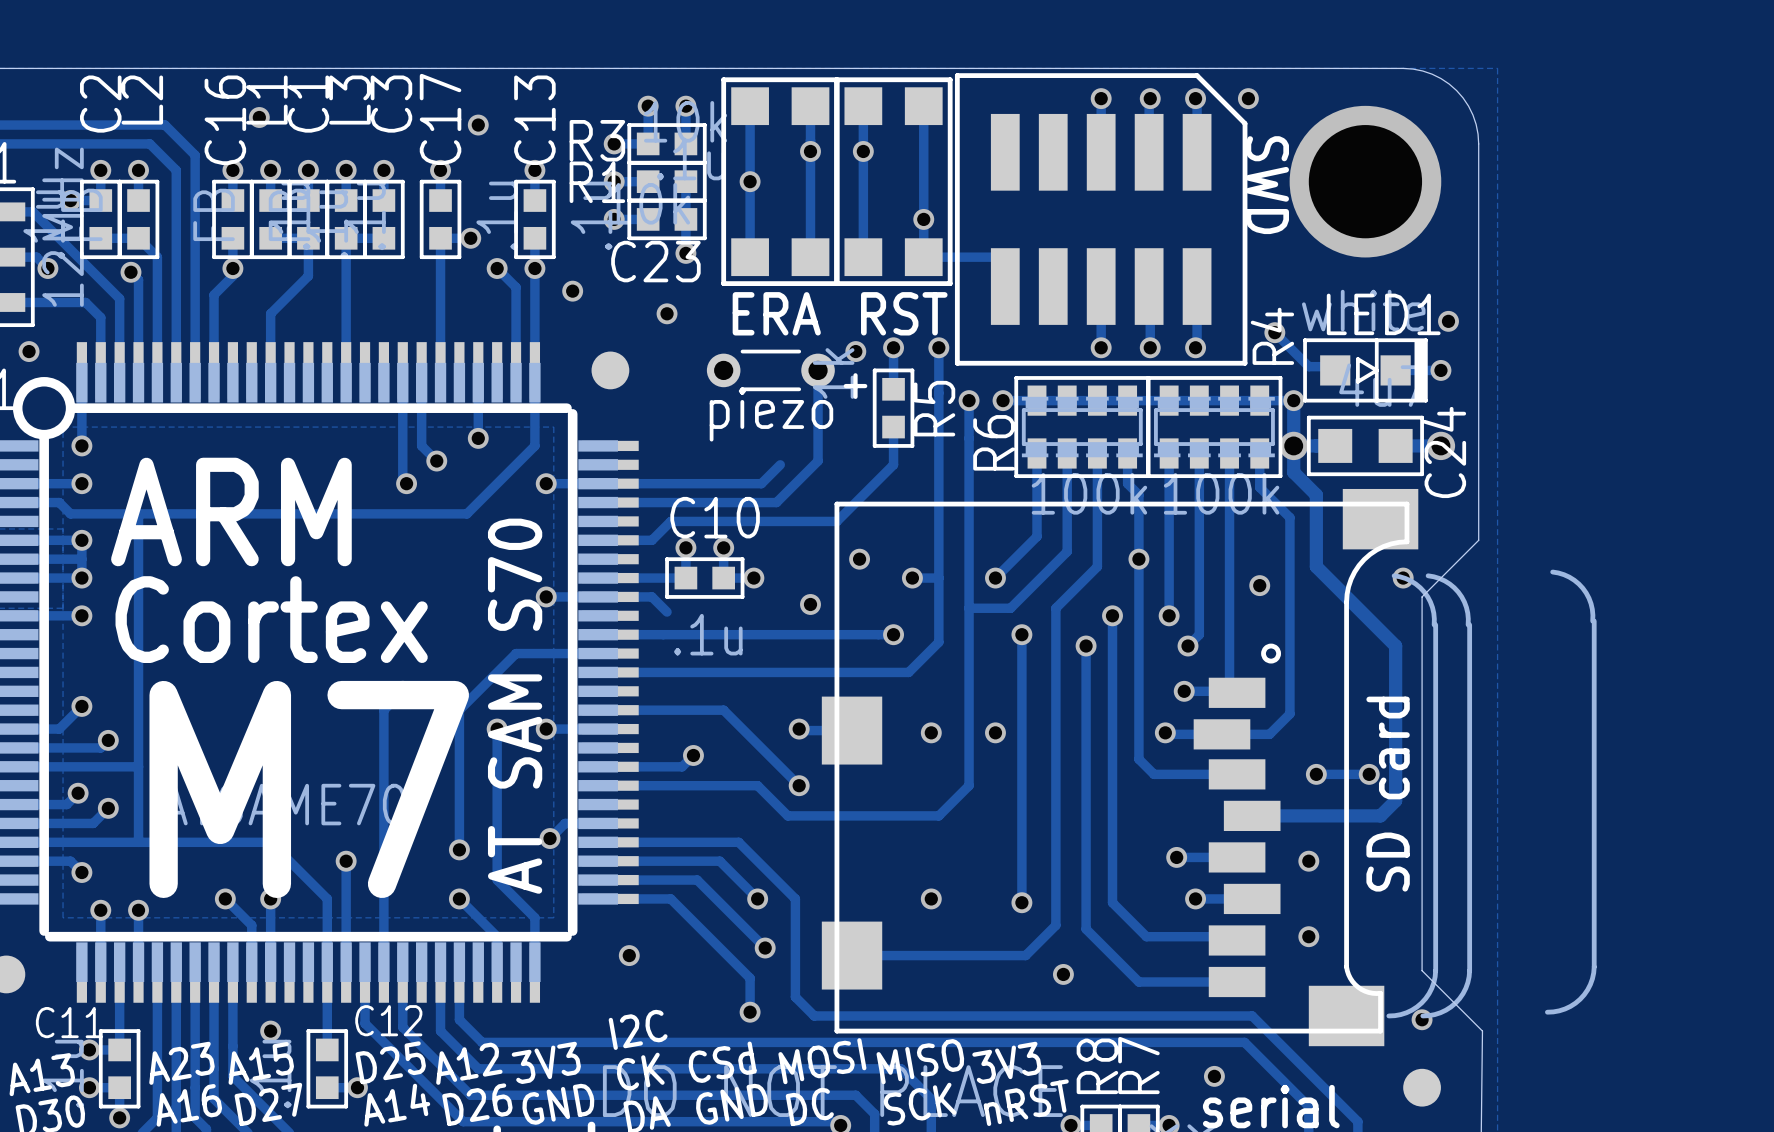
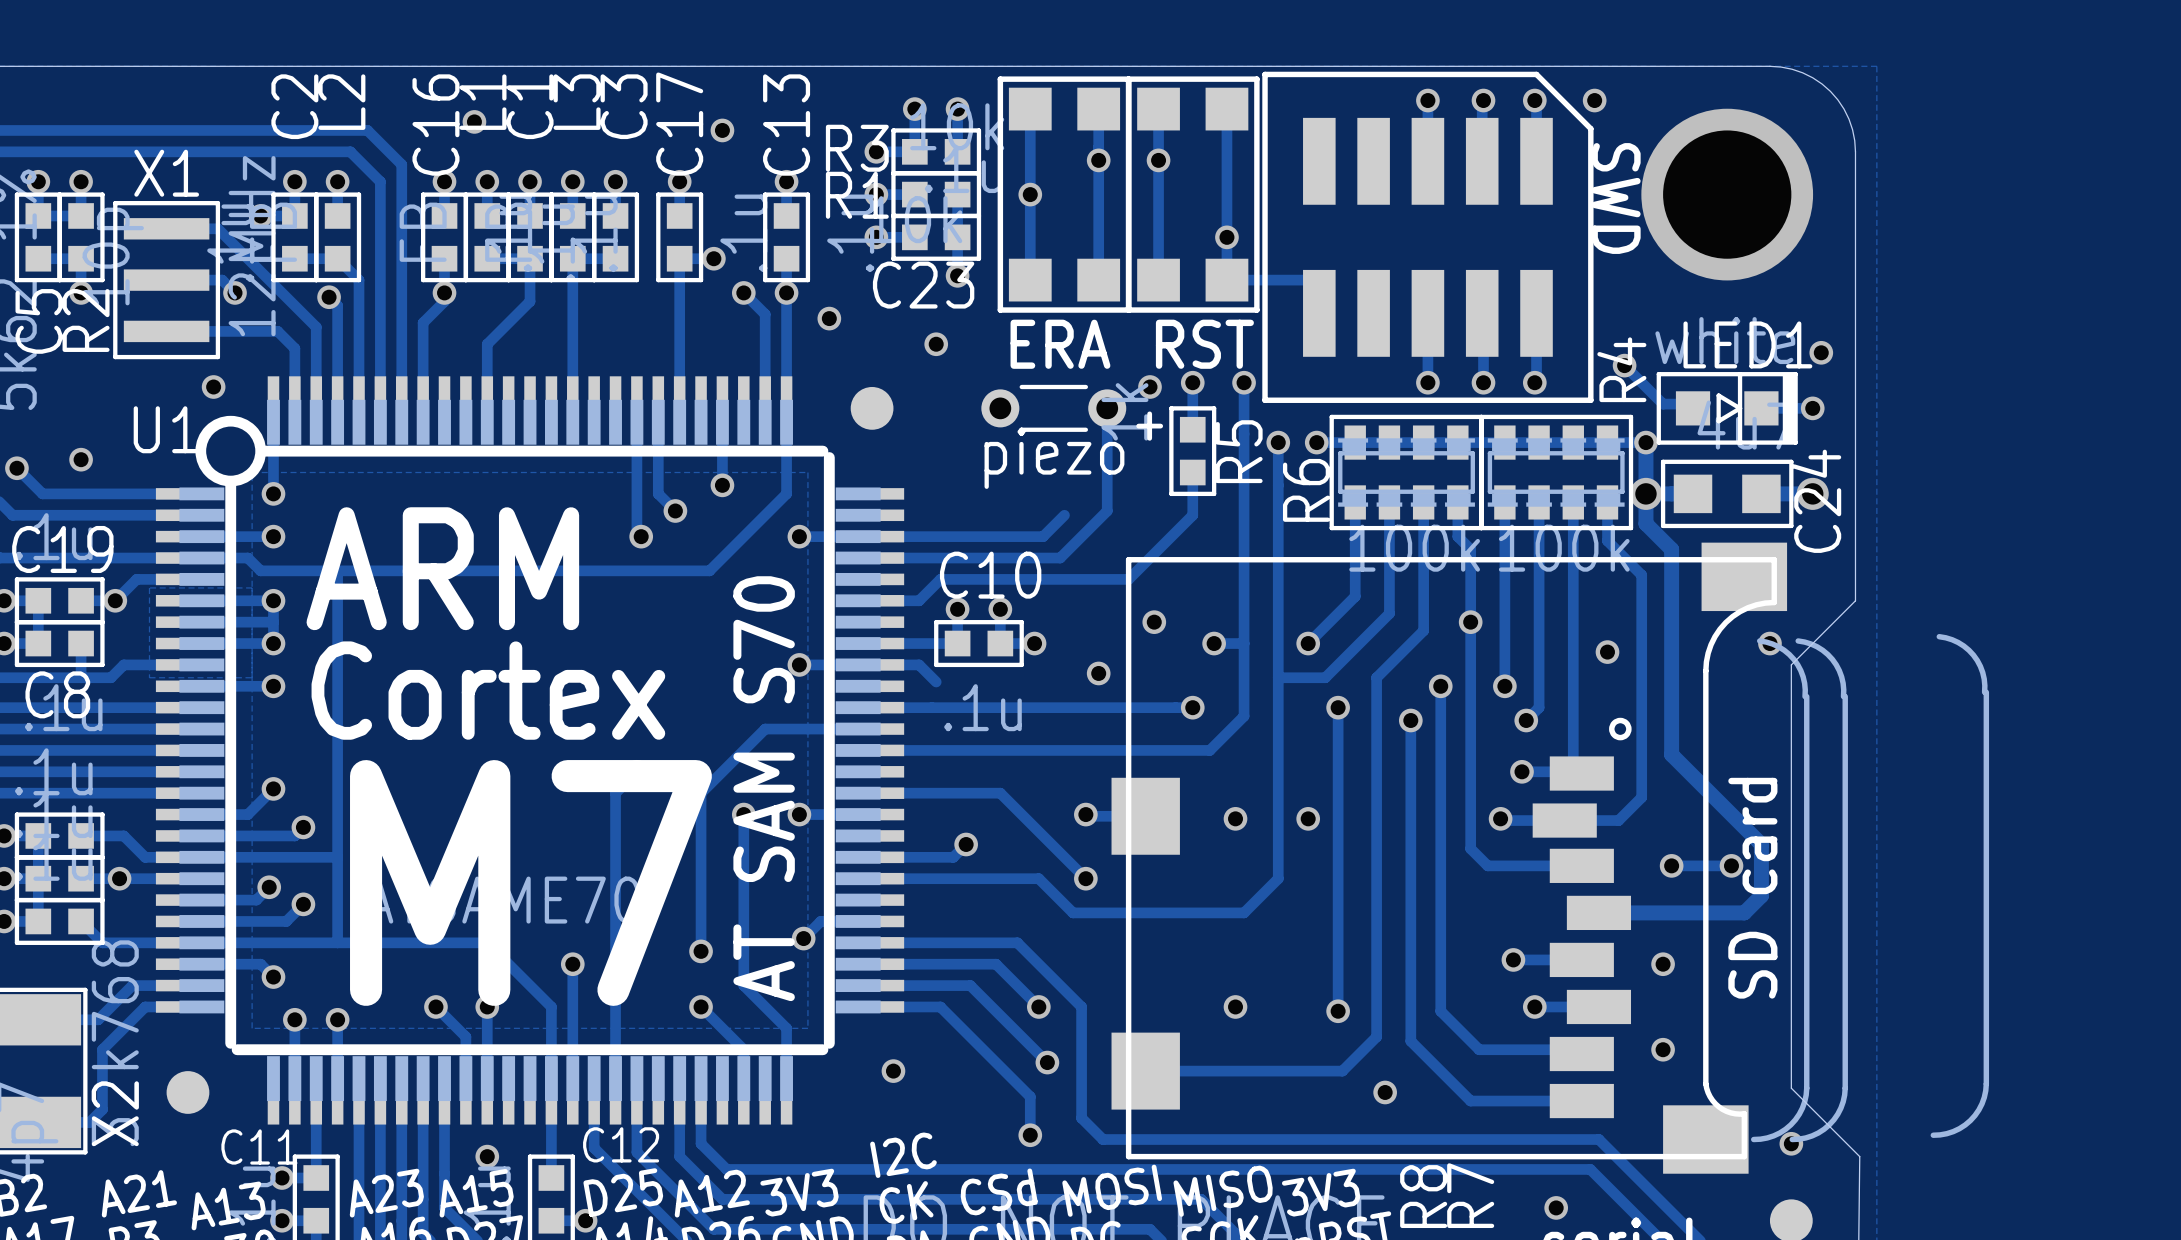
track: (1316, 566) (1395, 646) (1395, 755) -> (1671, 630) (1671, 754) (1761, 844)

